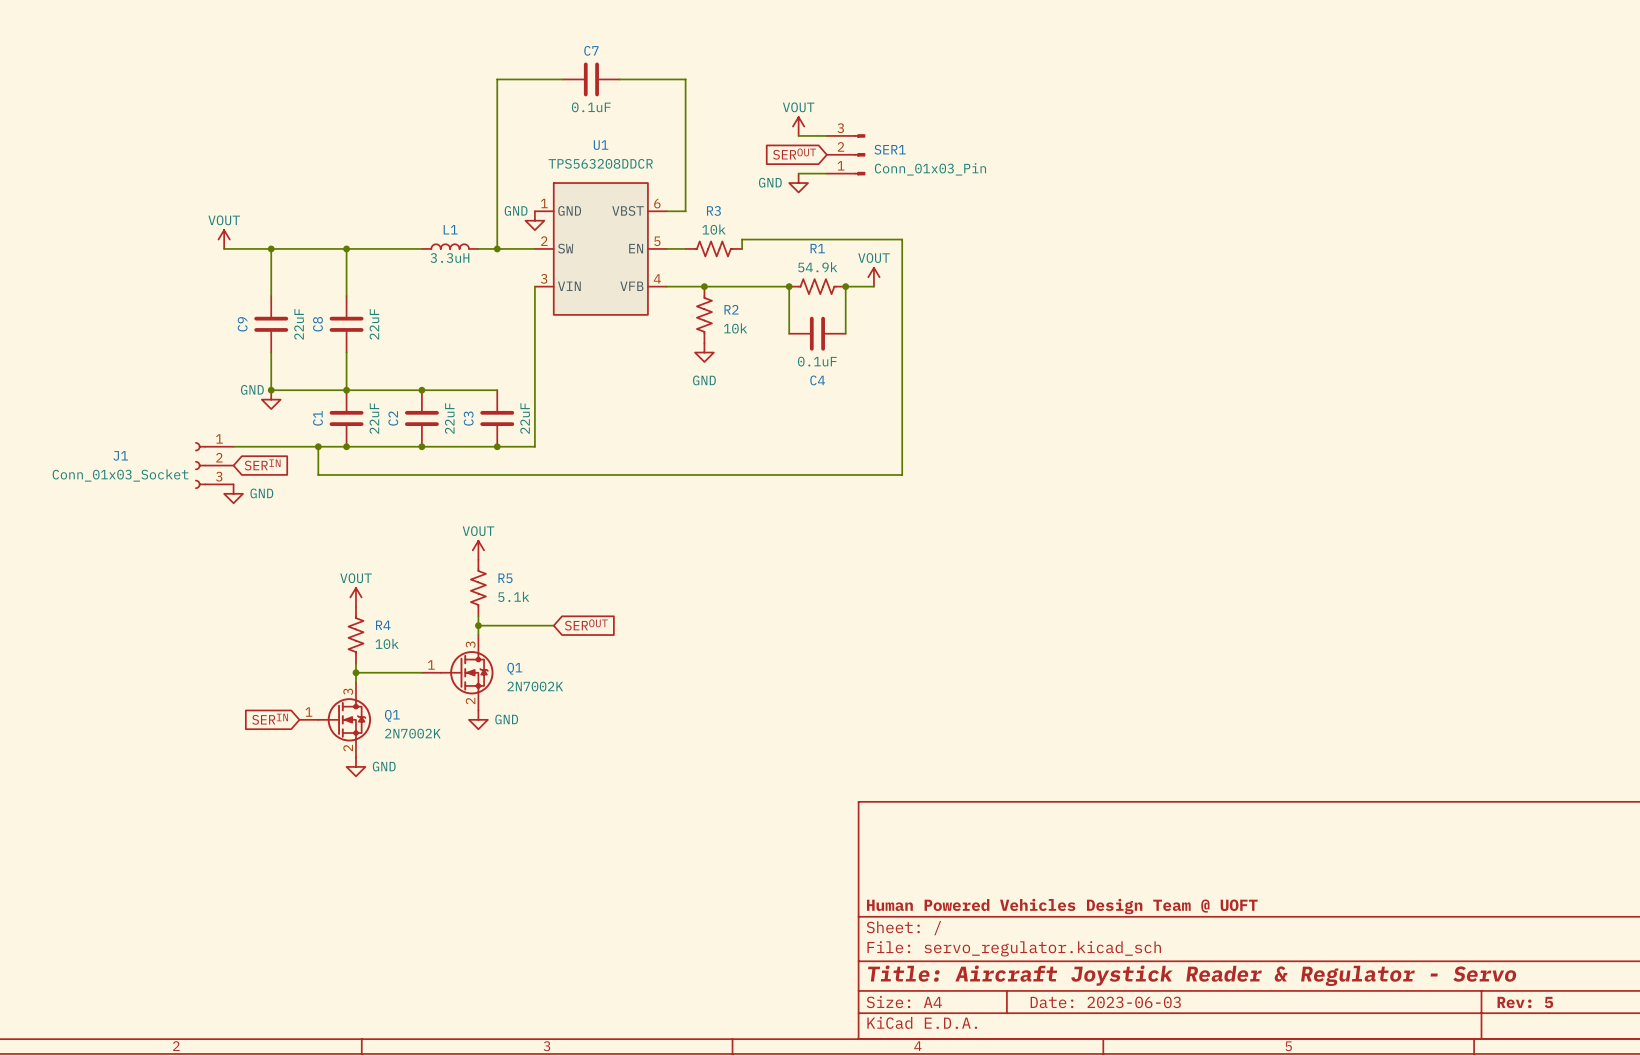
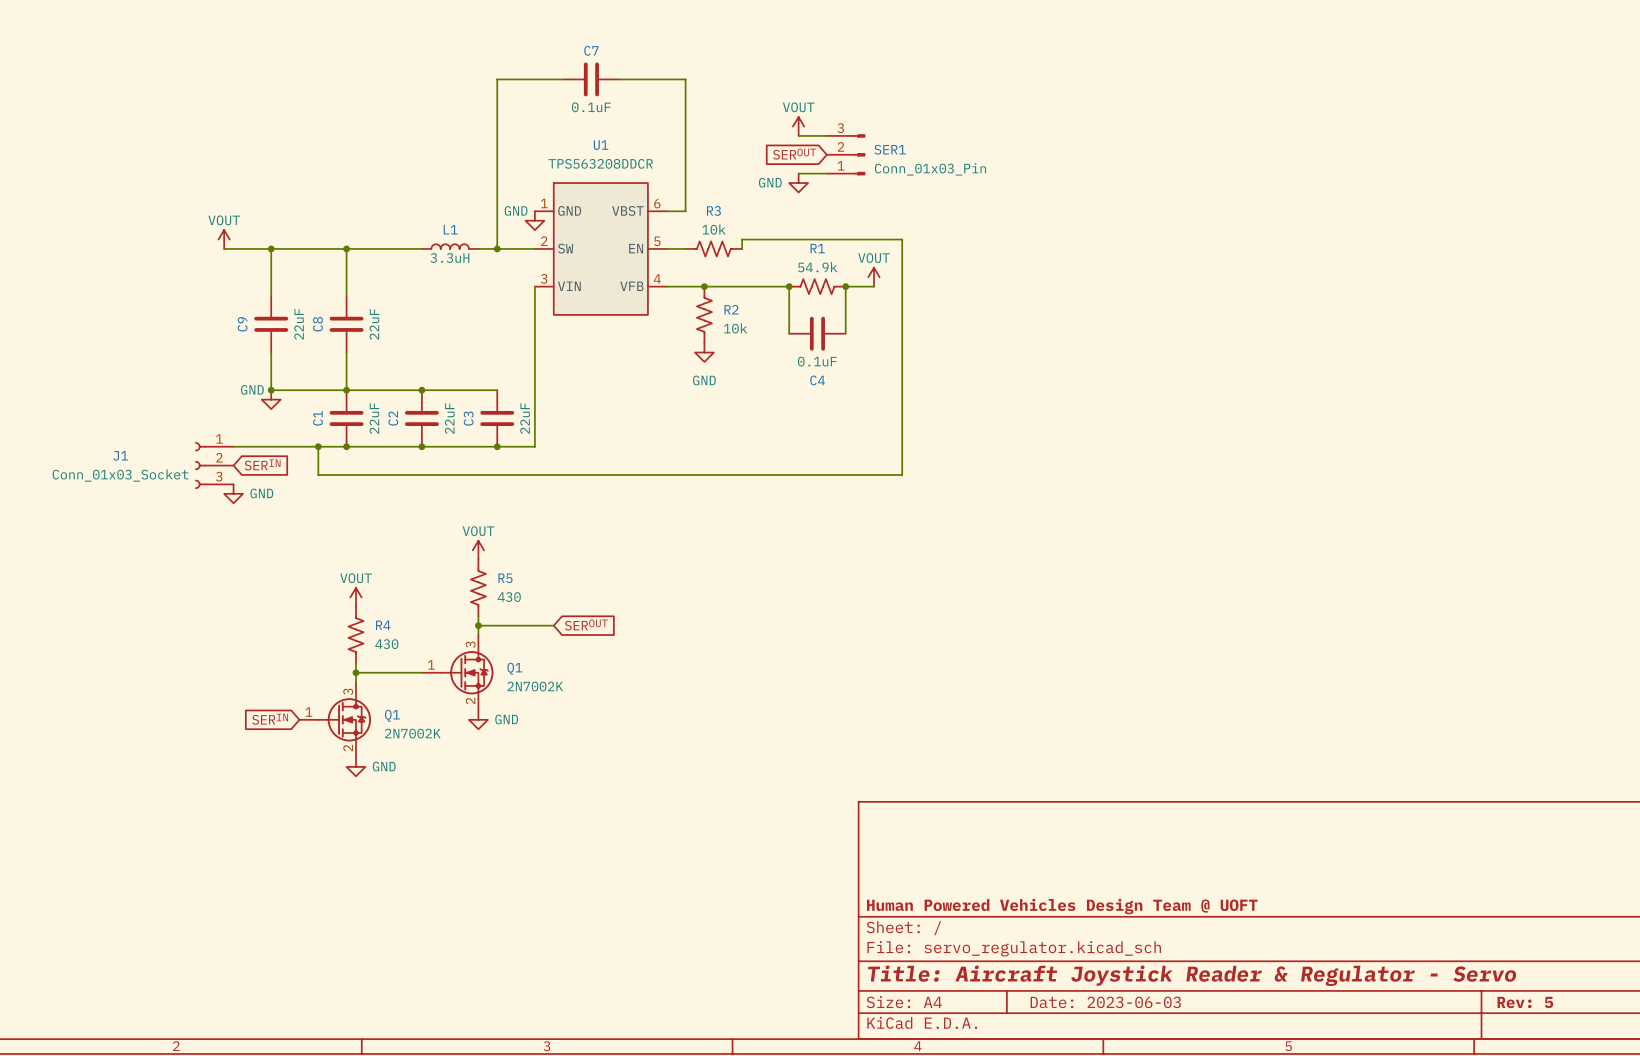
R5 value: 5.1k (513, 596) -> 430 (509, 597)
R4 value: 10k (387, 643) -> 430 (386, 644)

